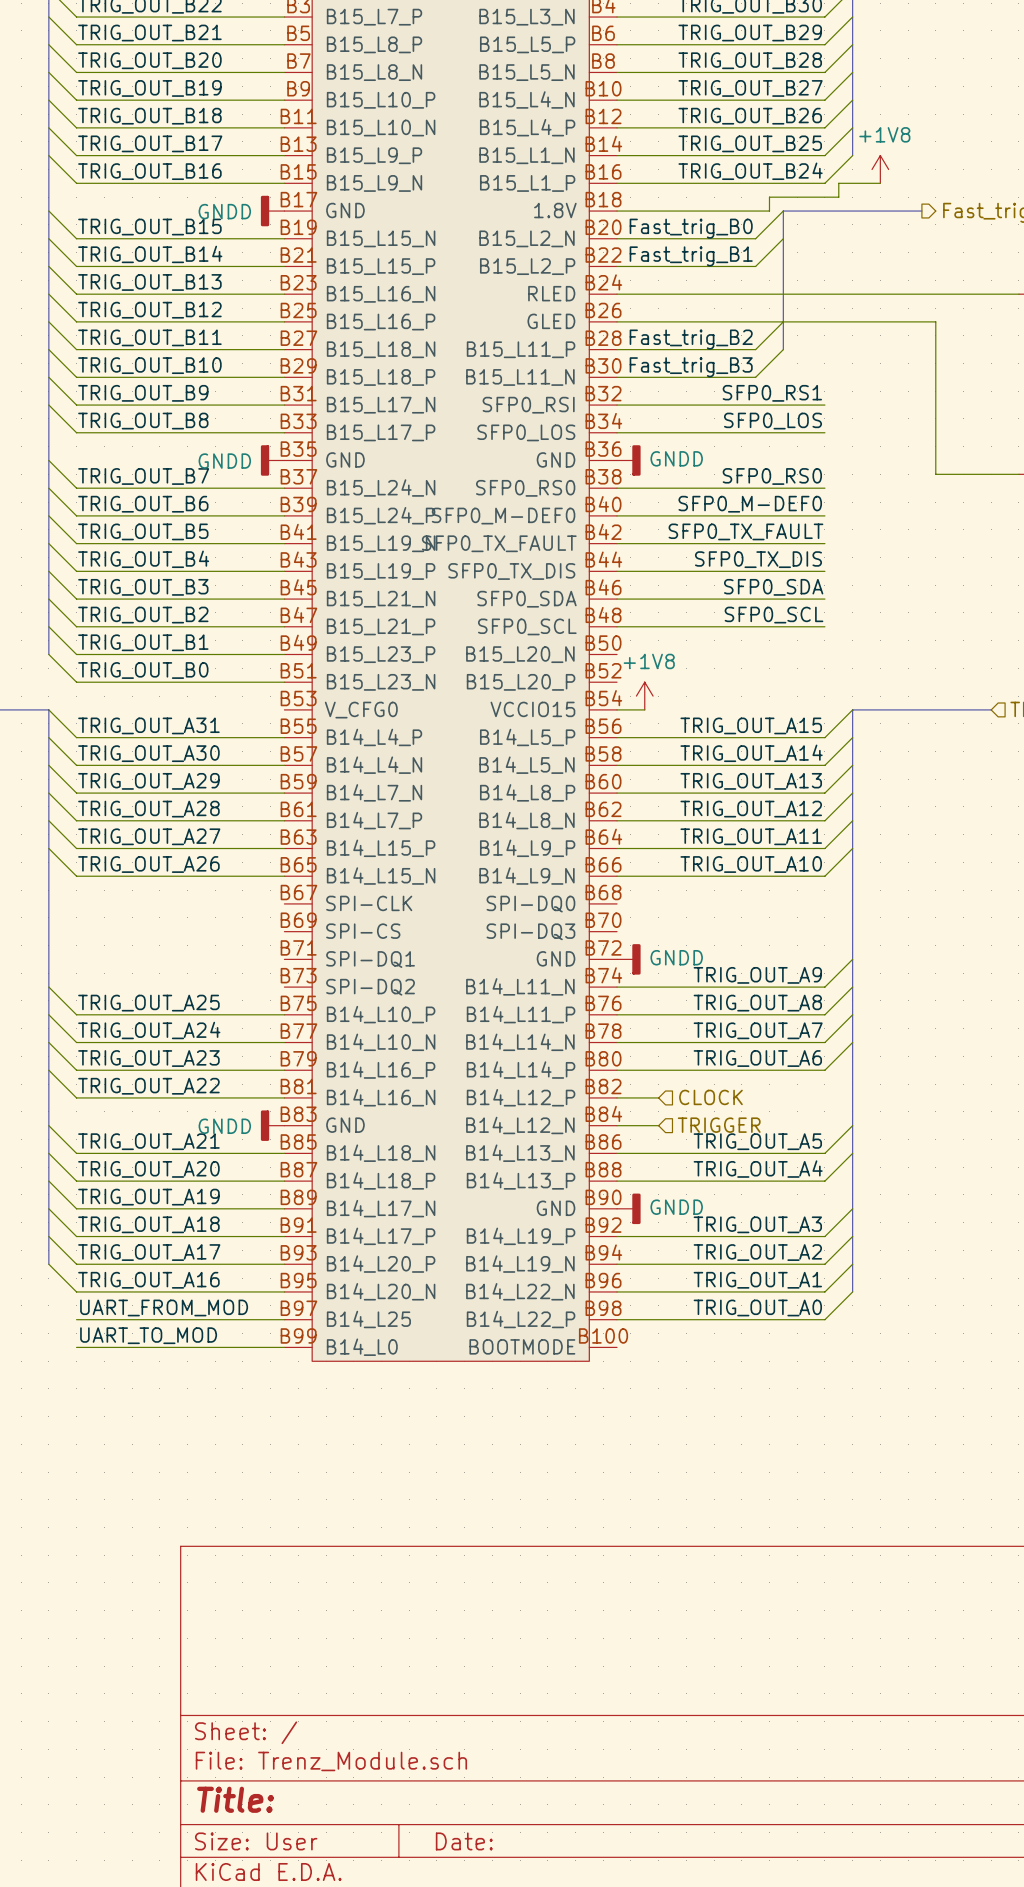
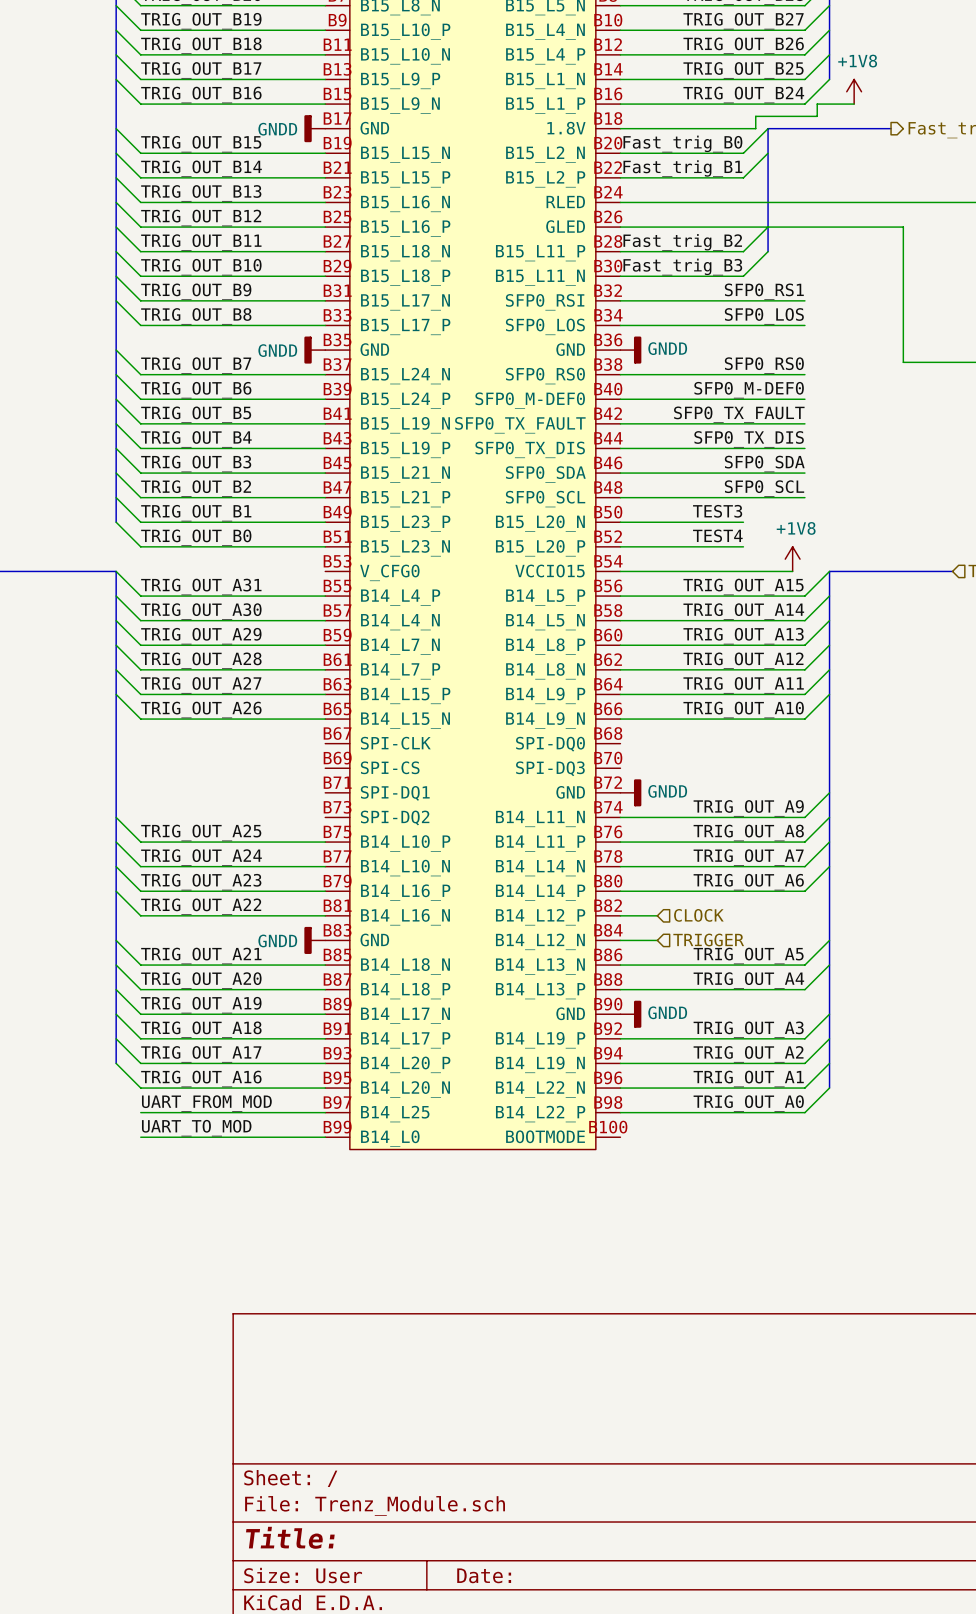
label: none -> TEST3 (717, 511)
wire: none -> (620, 522) (743, 522)
label: none -> TEST4 (717, 535)
wire: none -> (620, 546) (743, 546)
power symbol position: +1V8 (644, 696) -> +1V8 (792, 559)
wire: none -> (645, 571) (792, 571)

